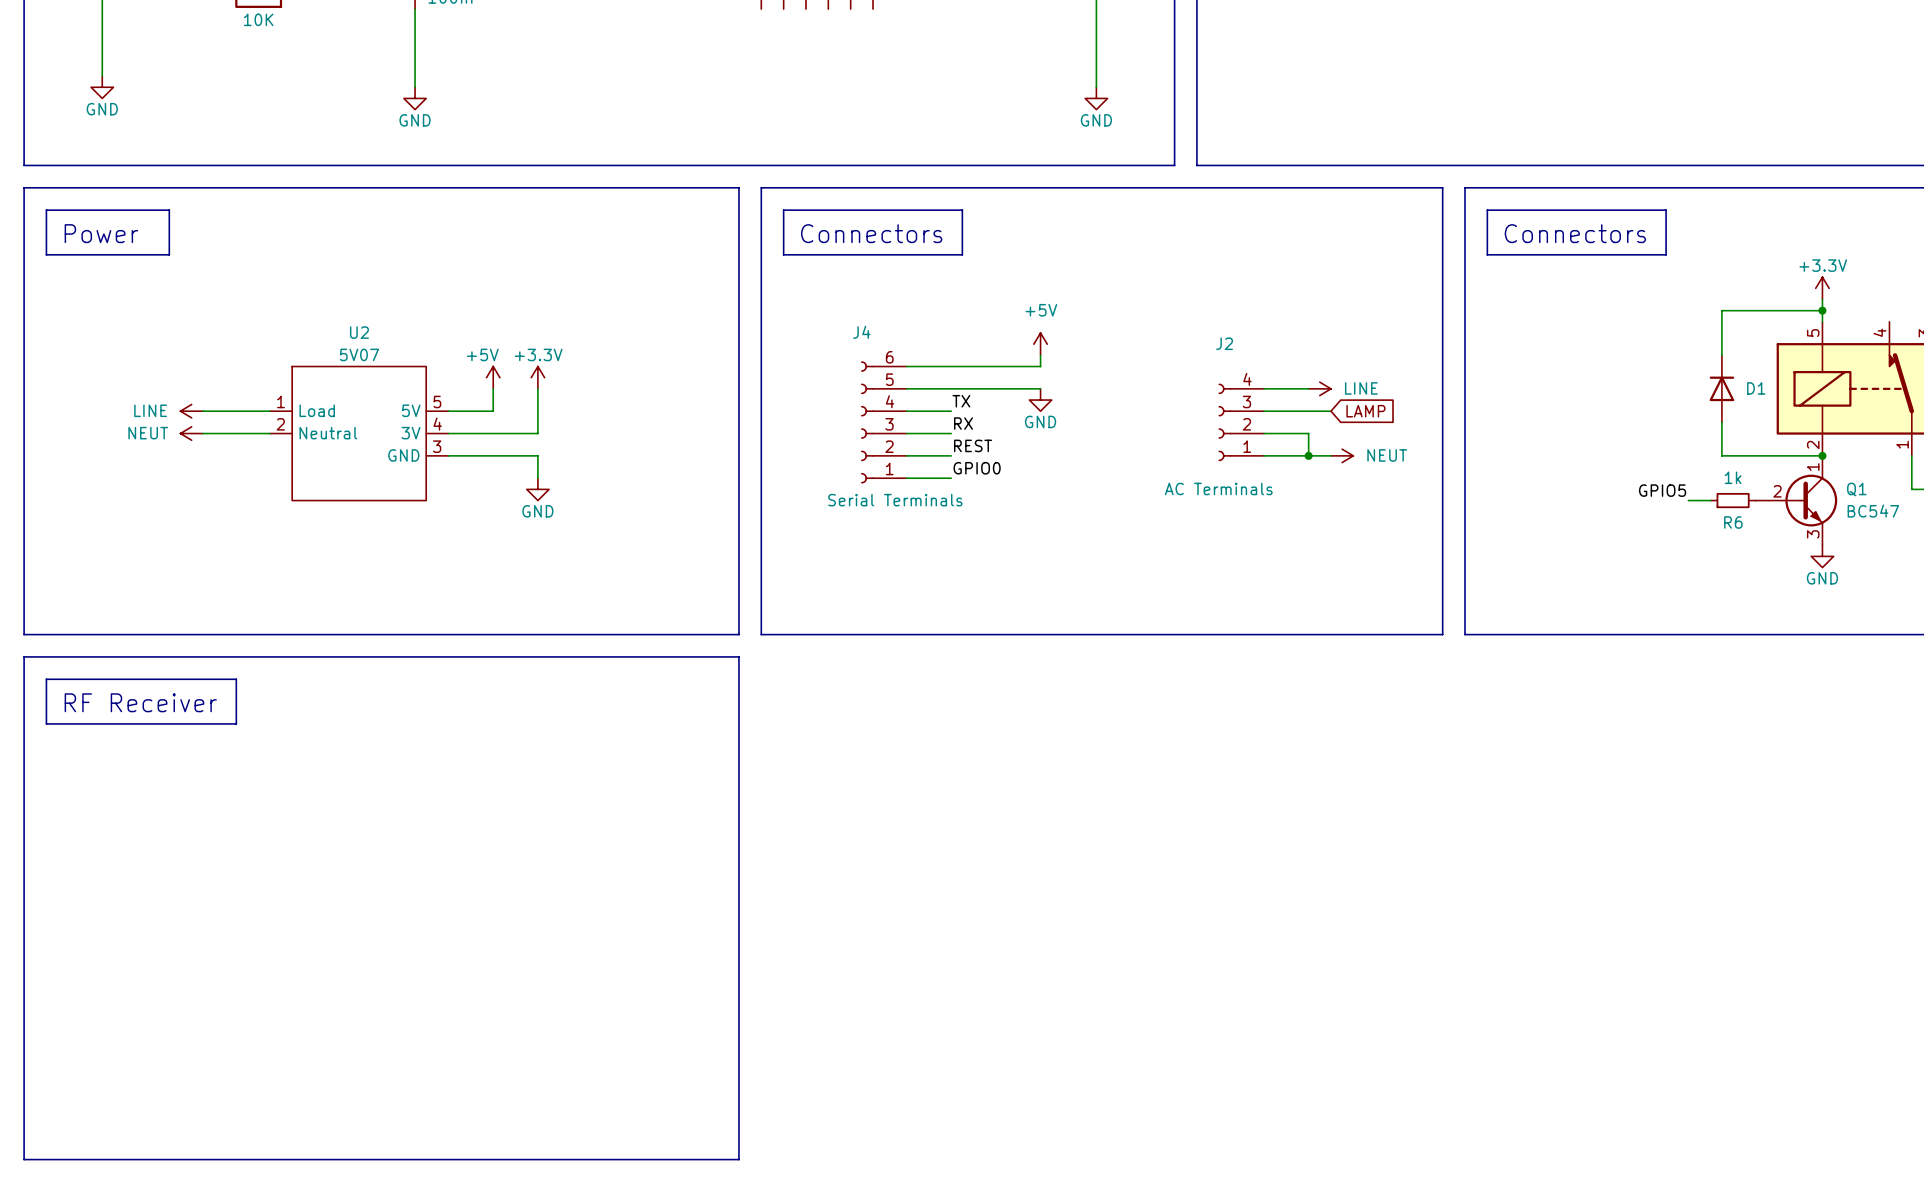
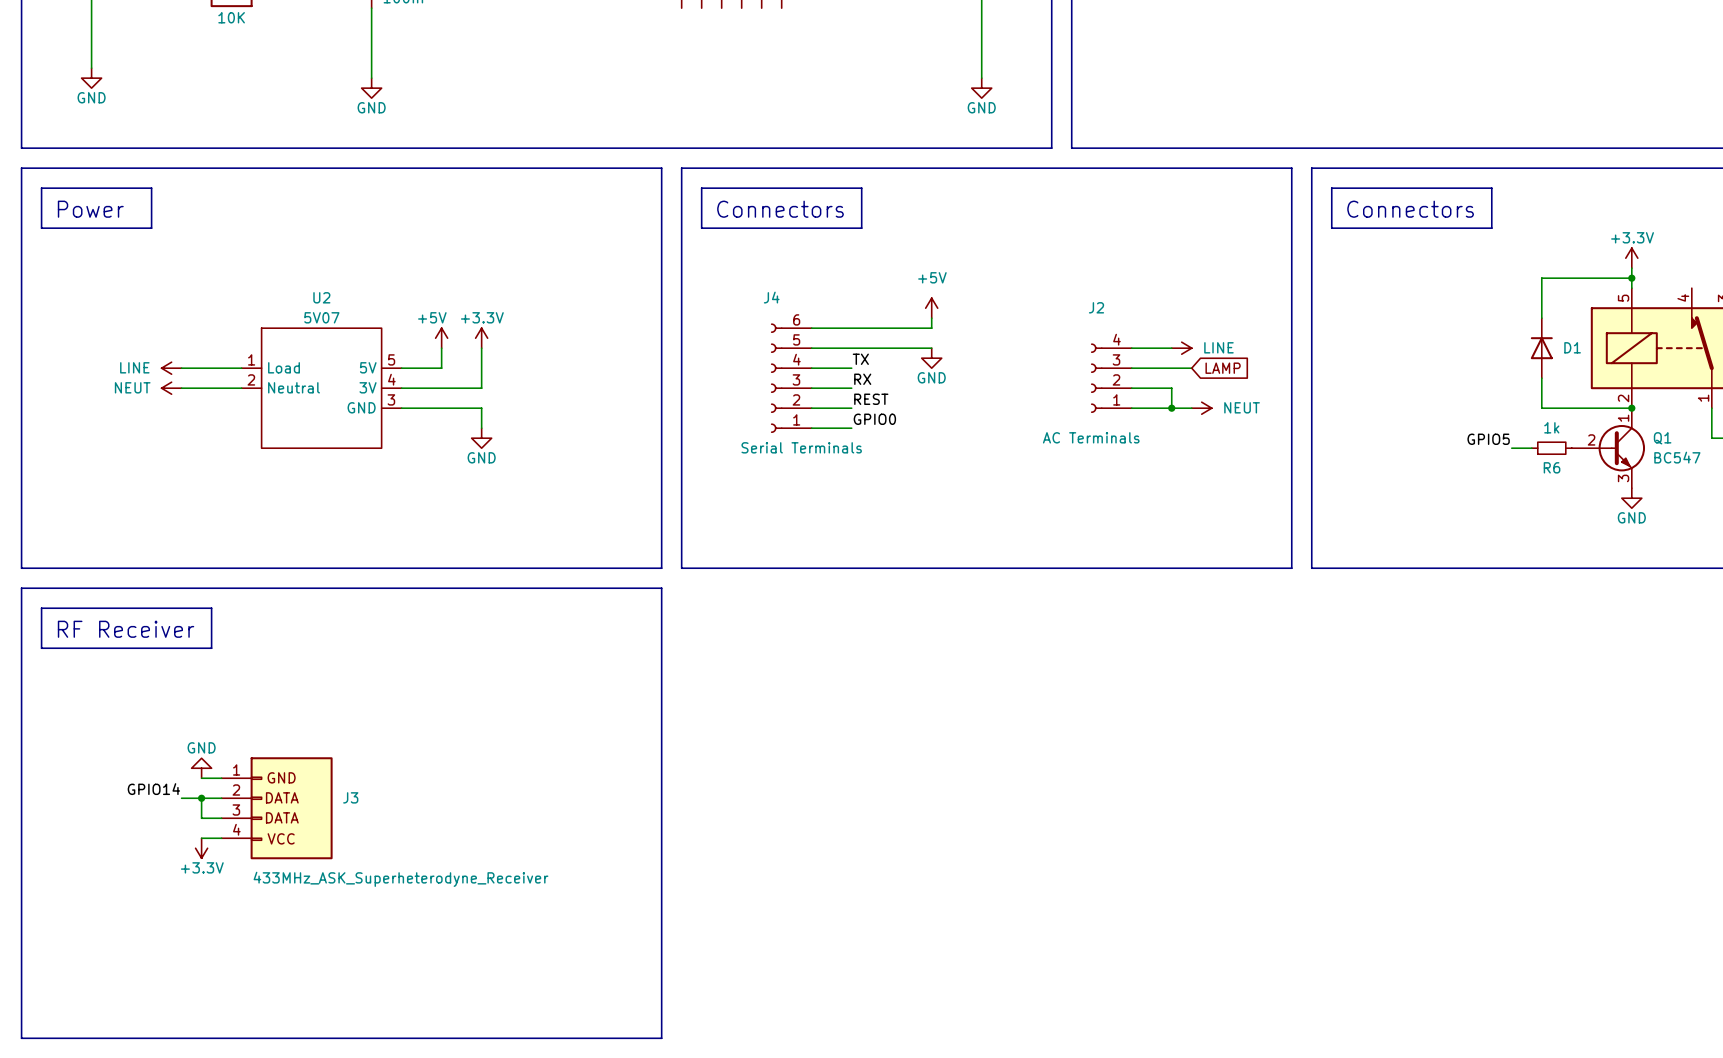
power symbol: none -> GND (201, 768)
wire: none -> (201, 778) (221, 778)
label: none -> GPIO14 (153, 789)
wire: none -> (181, 798) (221, 798)
wire: none -> (201, 798) (201, 818) (221, 818)
junction: none -> (201, 798)
J3: none -> 433MHz_ASK_Superheterodyne_Receiver (277, 808)
wire: none -> (201, 838) (221, 838)
power symbol: none -> +3.3V (201, 848)

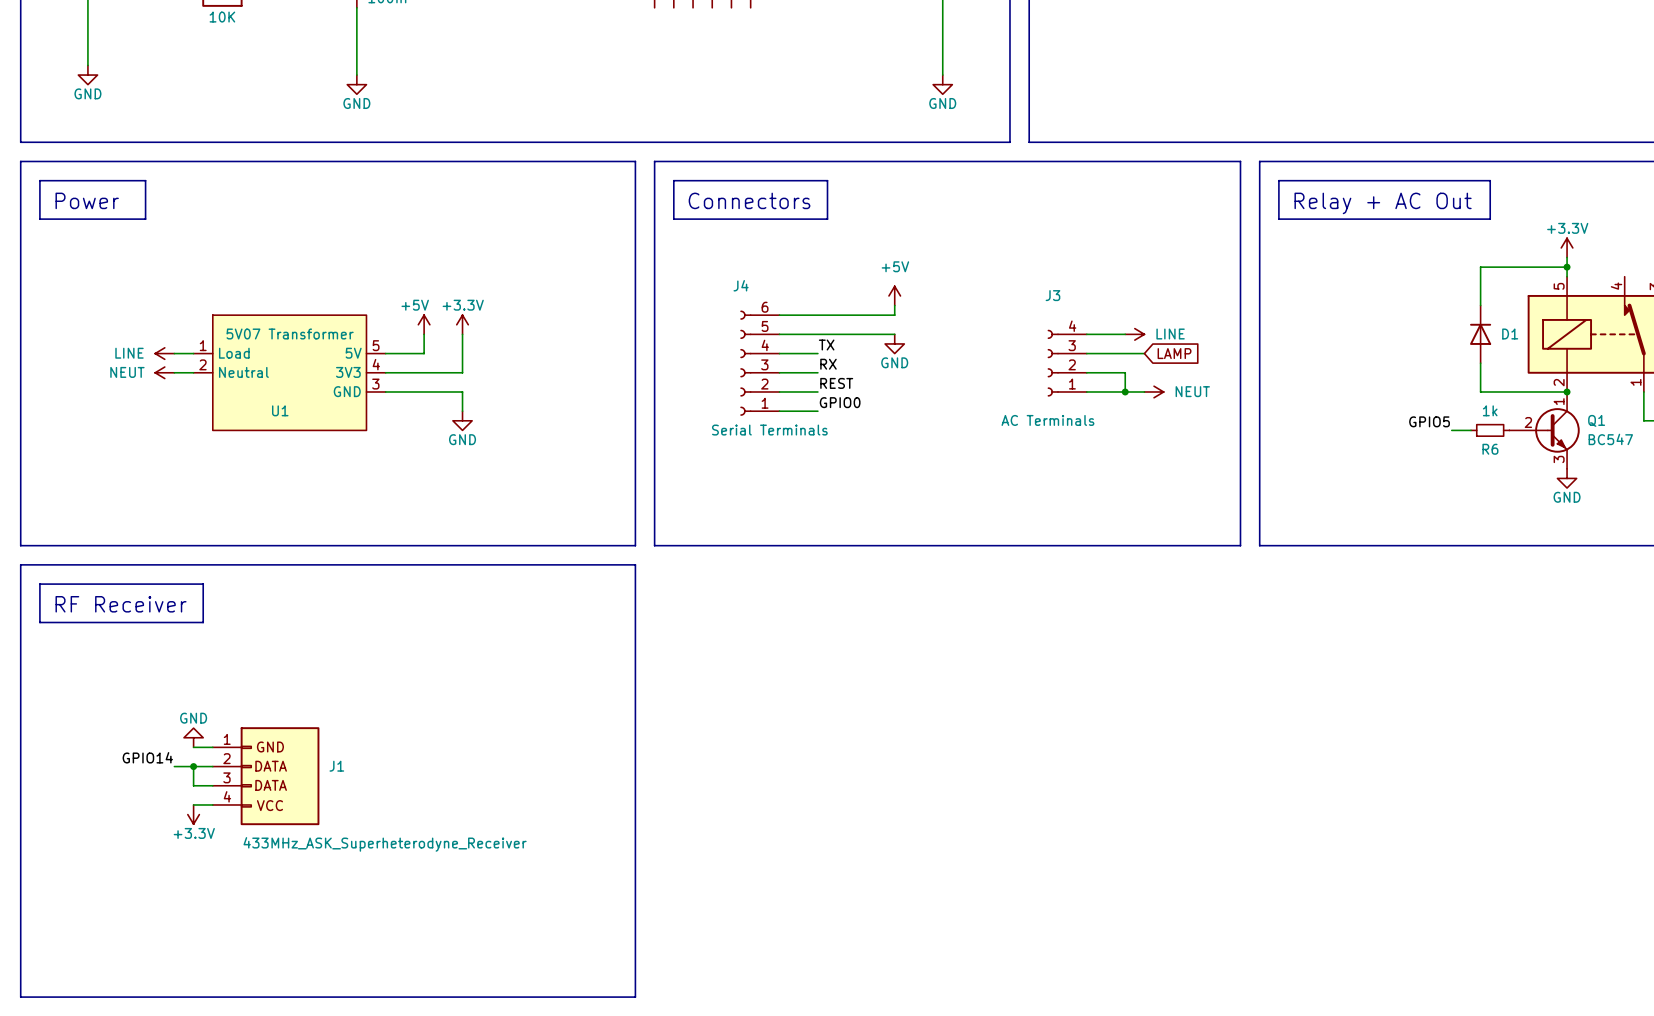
line: (1491, 188) (1491, 228) -> (1432, 180) (1490, 180) (1490, 219) (1432, 219)
text: Connectors (1410, 209) -> Relay + AC Out (1383, 203)
J2 name: J2 (1096, 307) -> J3 (1052, 295)
U1: none -> 5V07 Transformer (289, 372)
U2: 5V07 (321, 388) -> none
J3 name: J3 (350, 797) -> J1 (336, 766)

